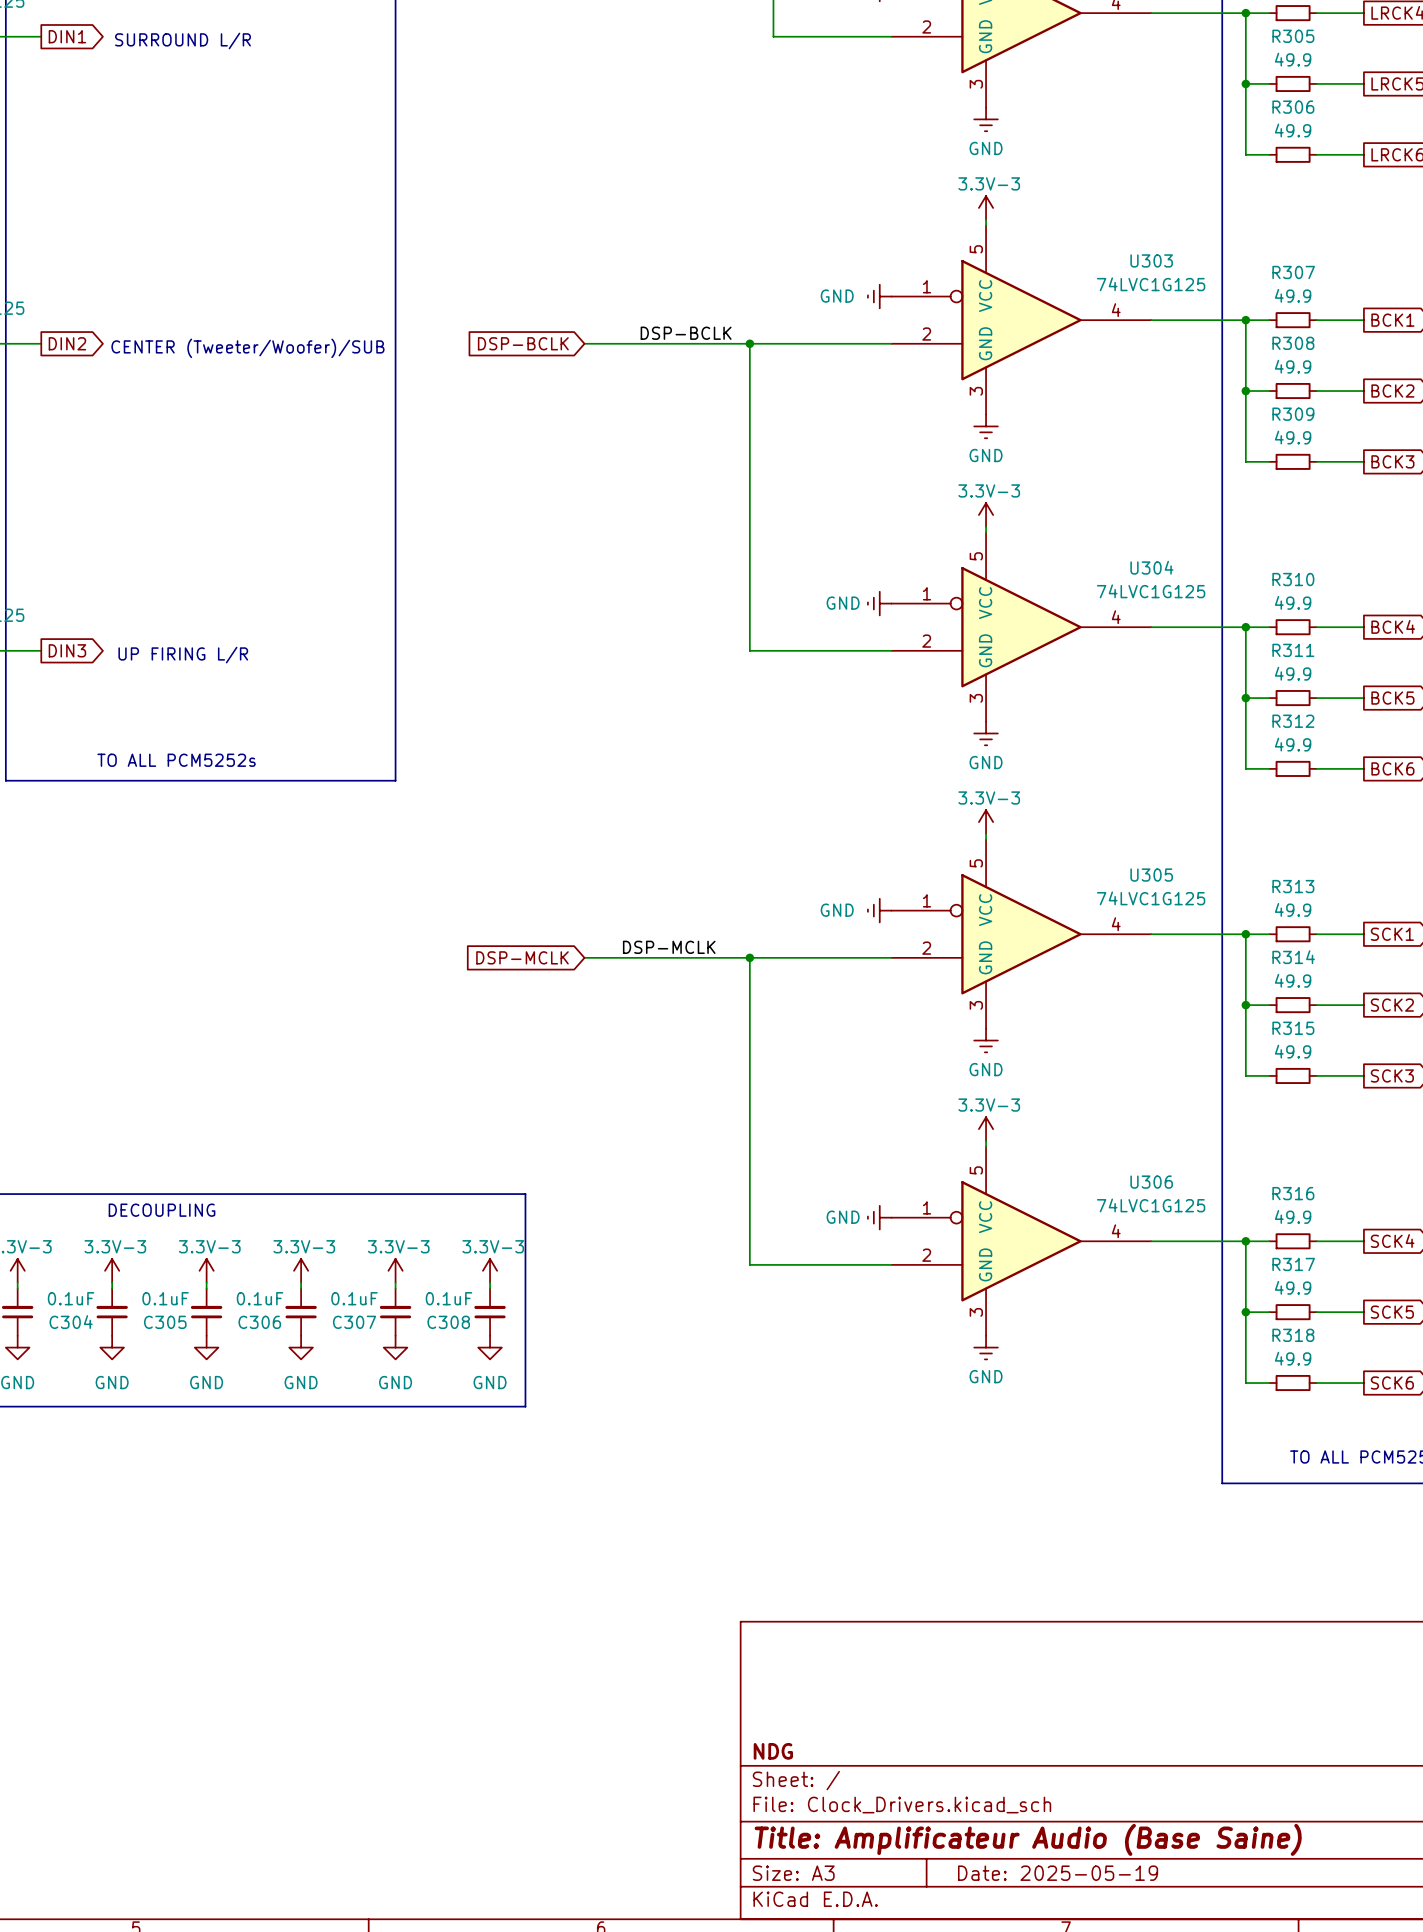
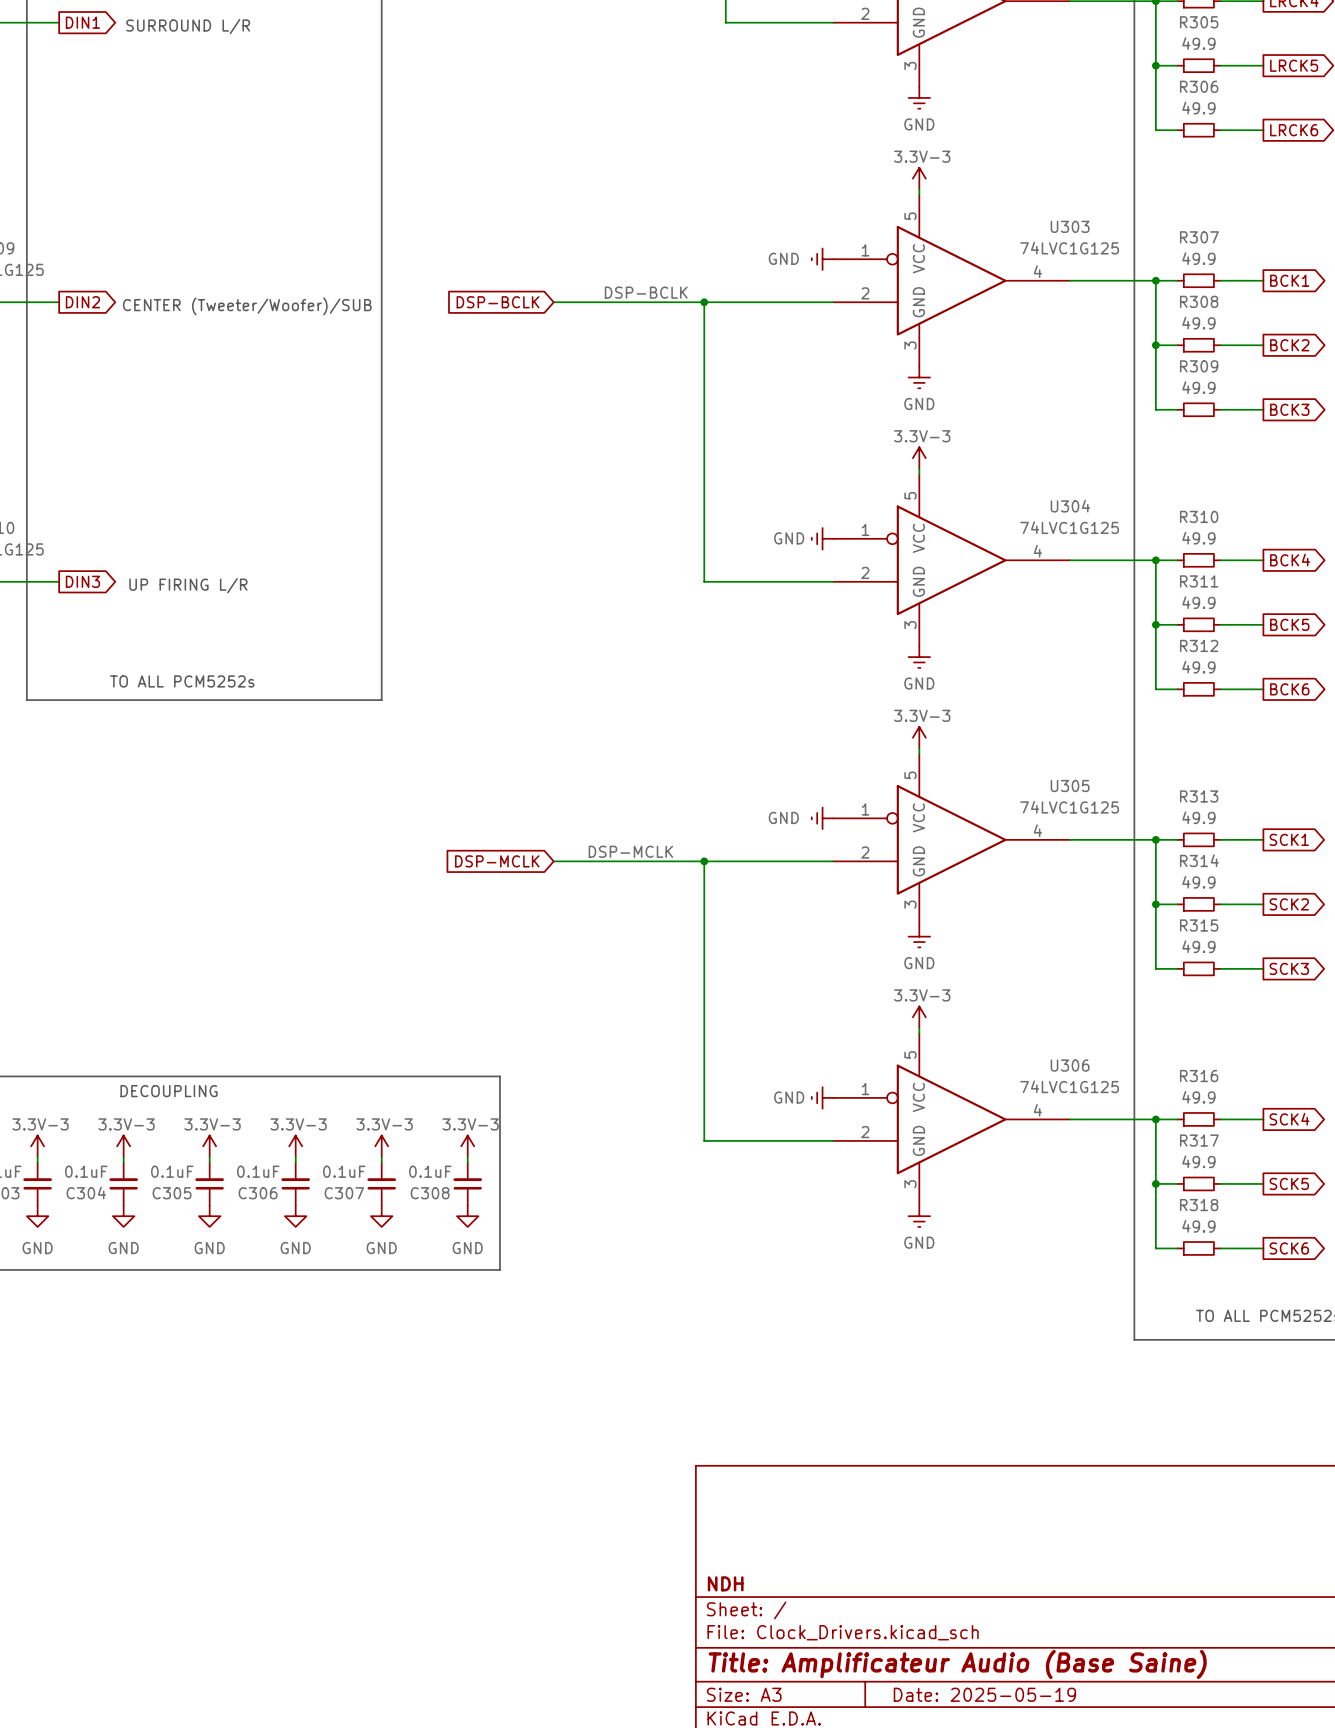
title block: NDG (773, 1751) -> NDH (725, 1583)

